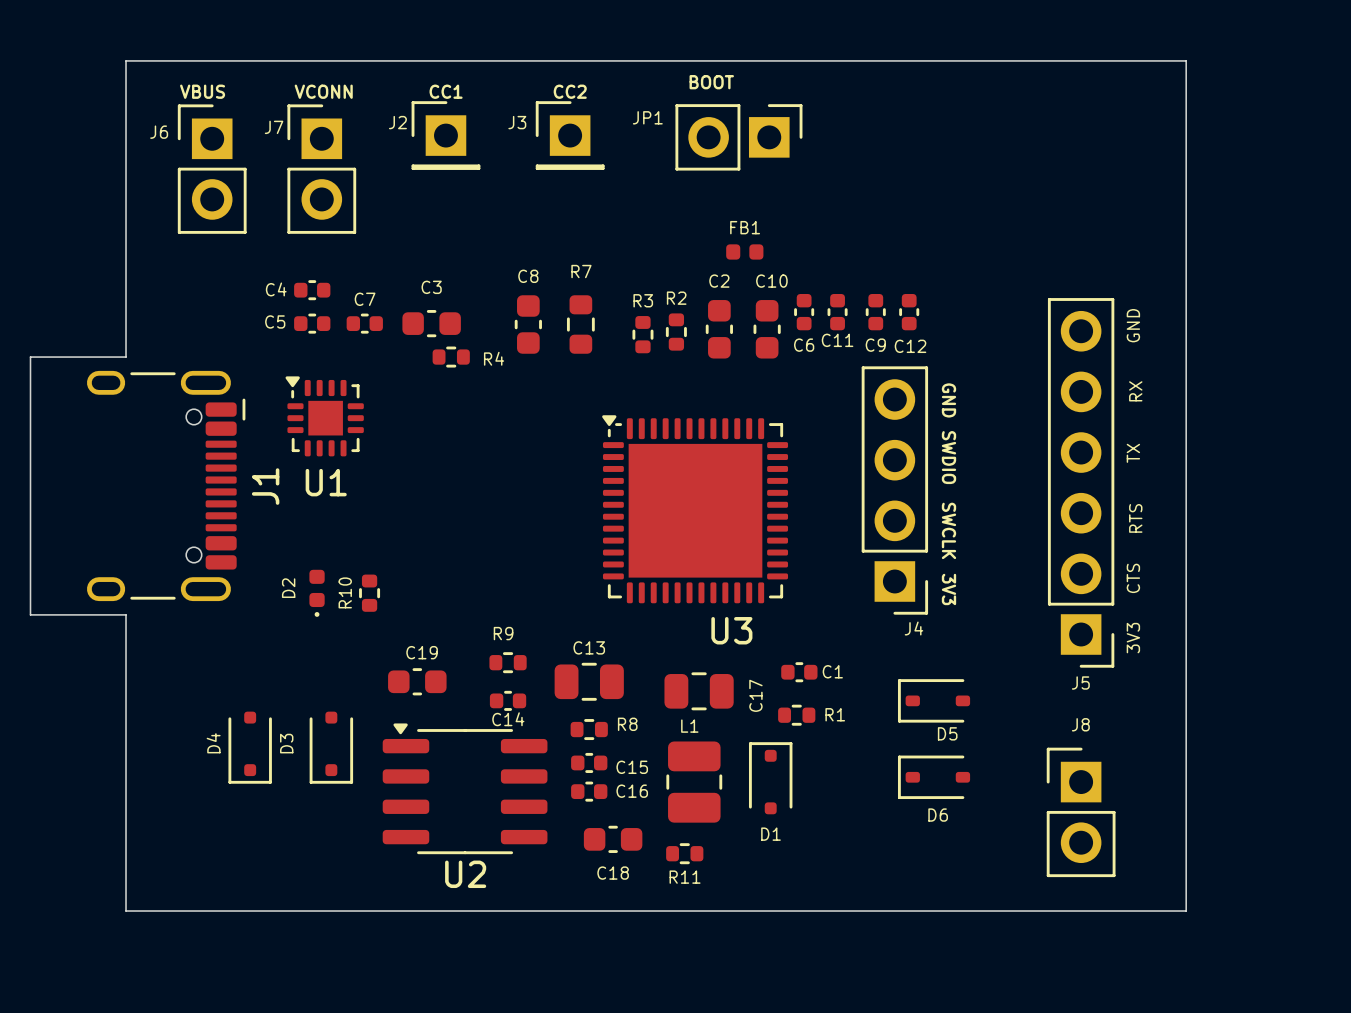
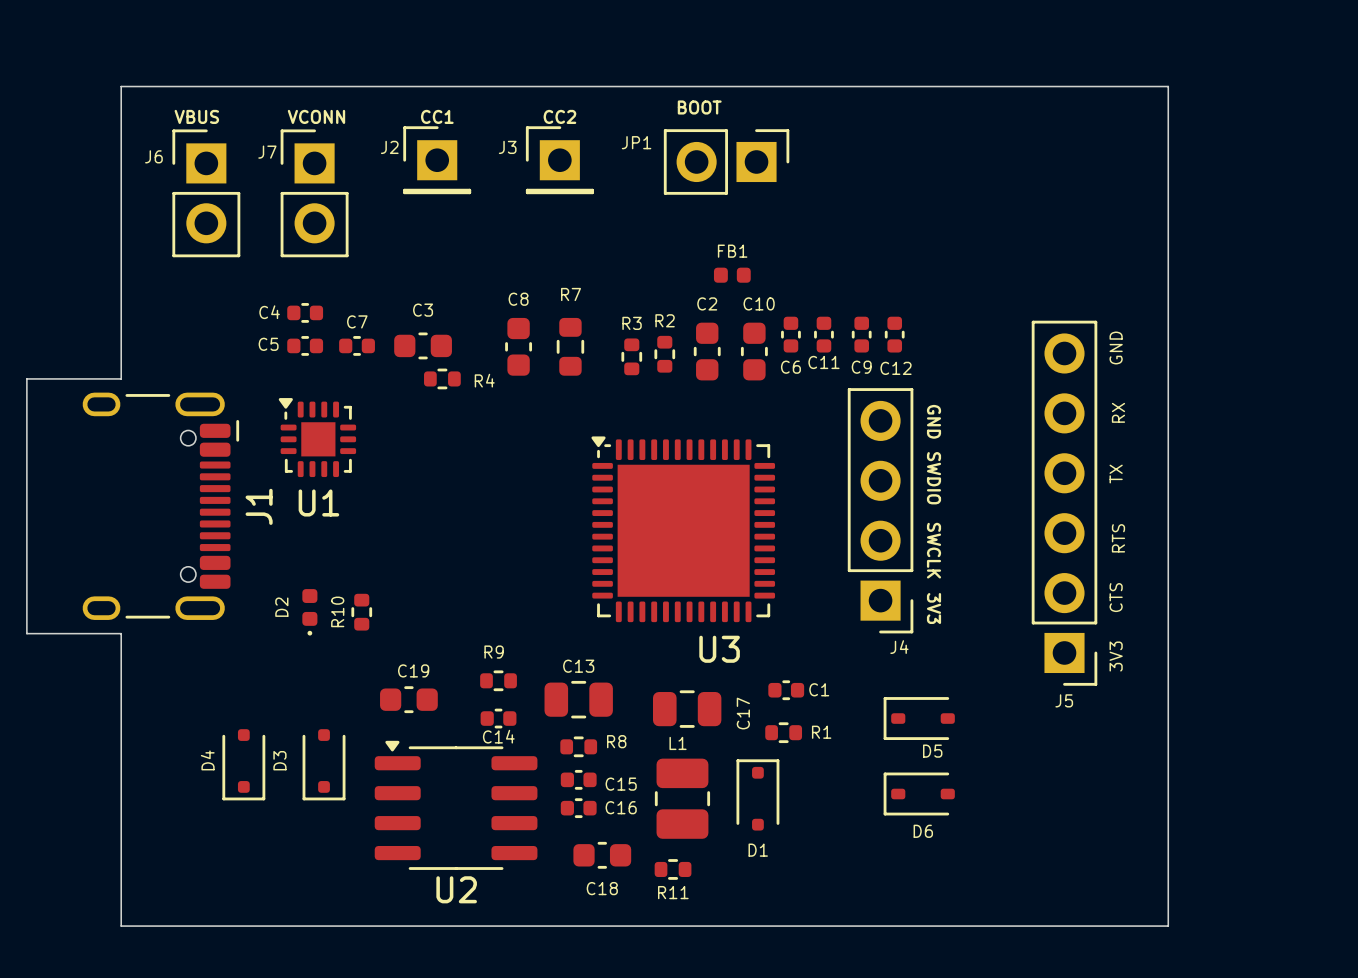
J8: (1081, 812) -> none

